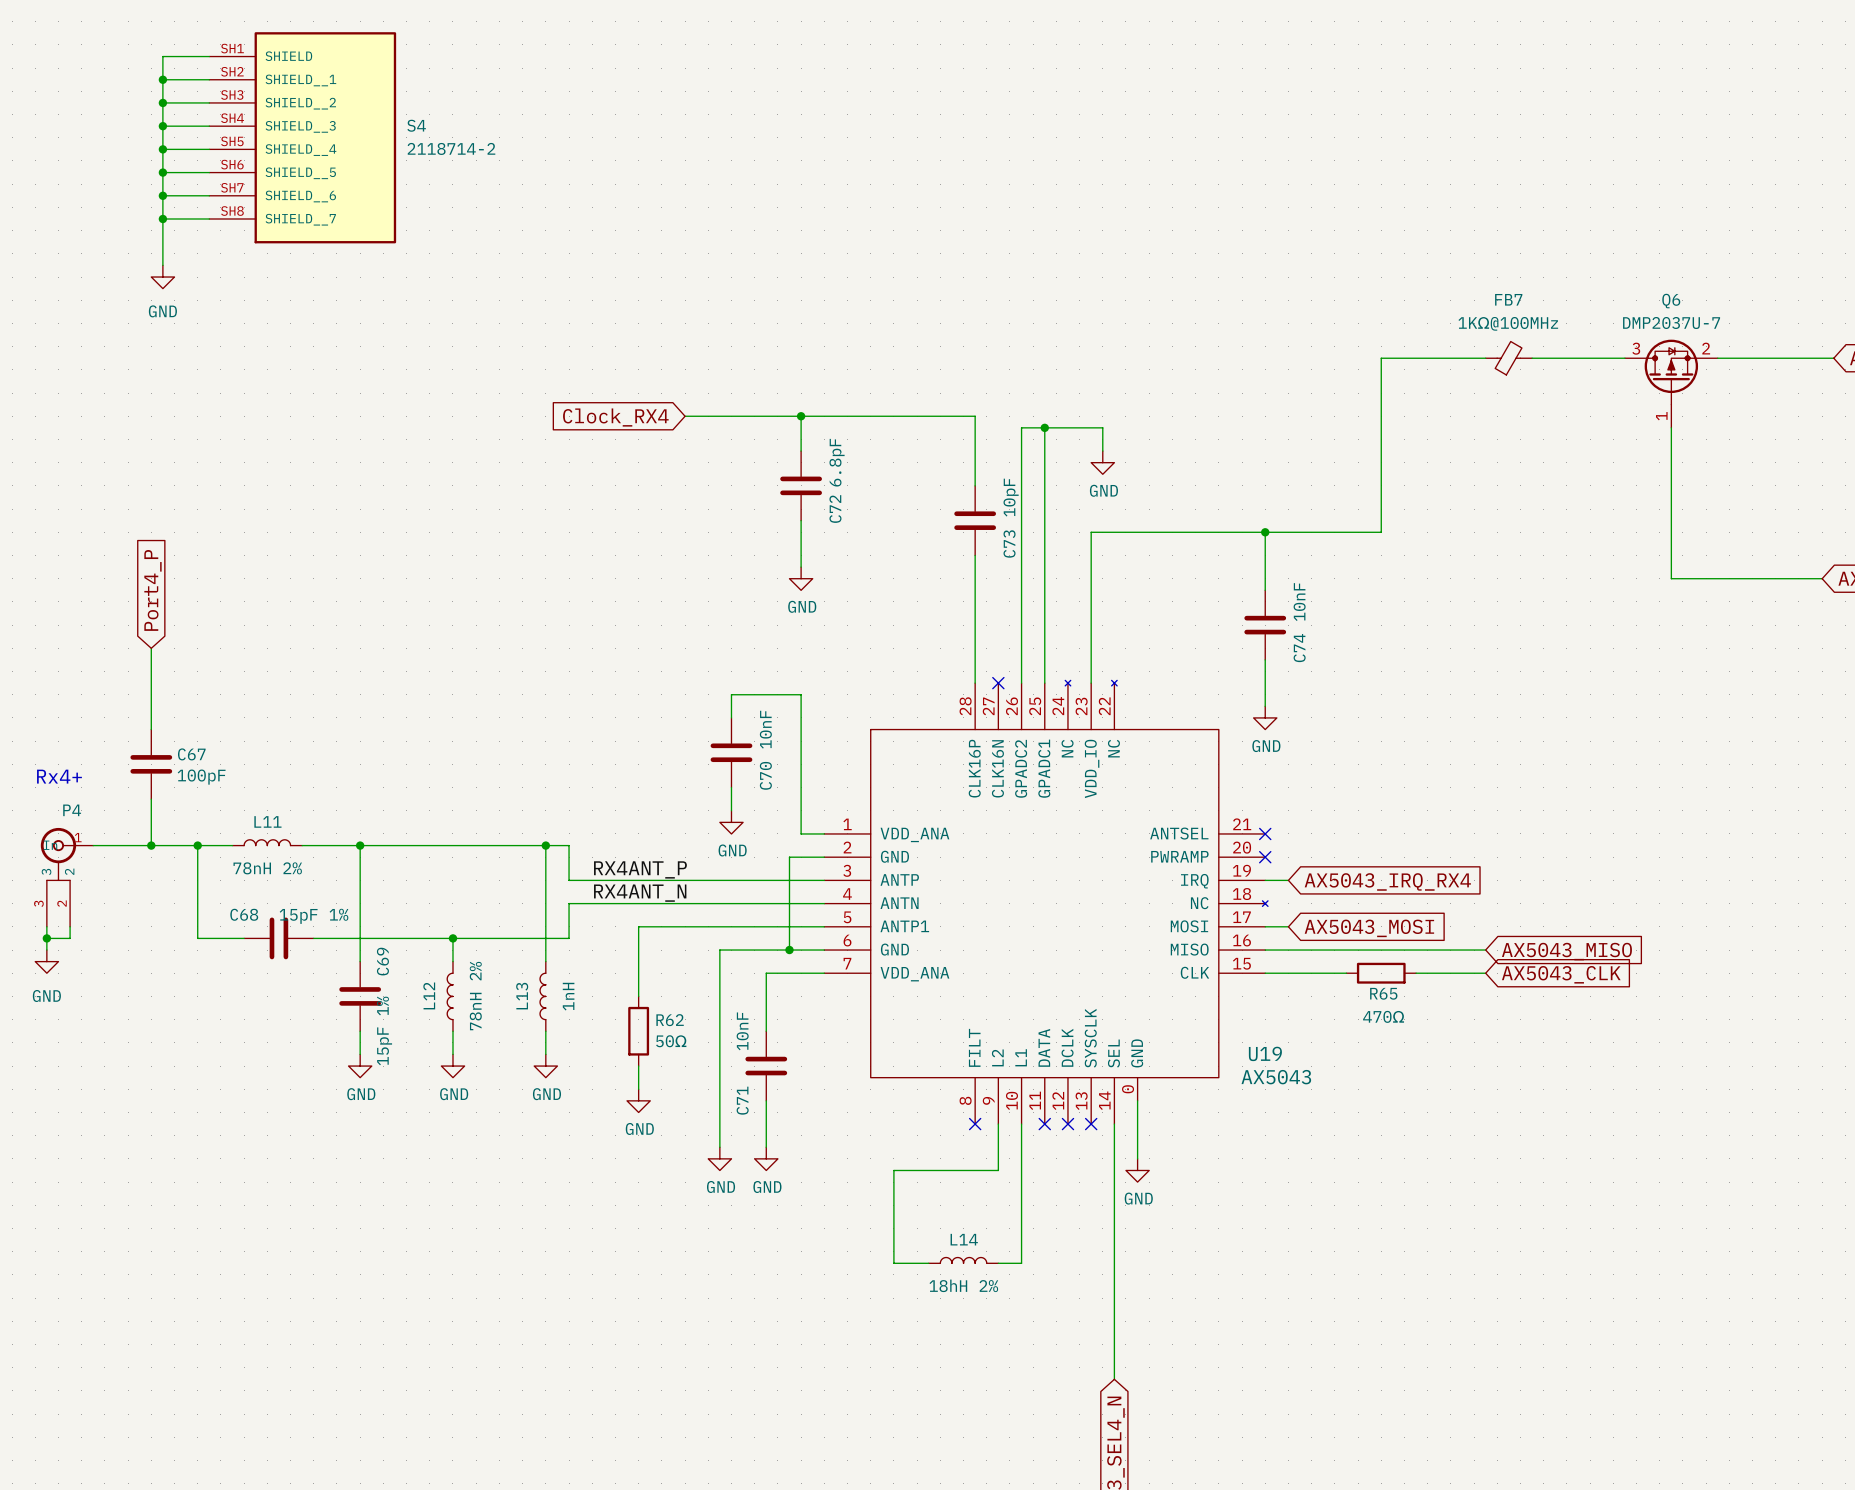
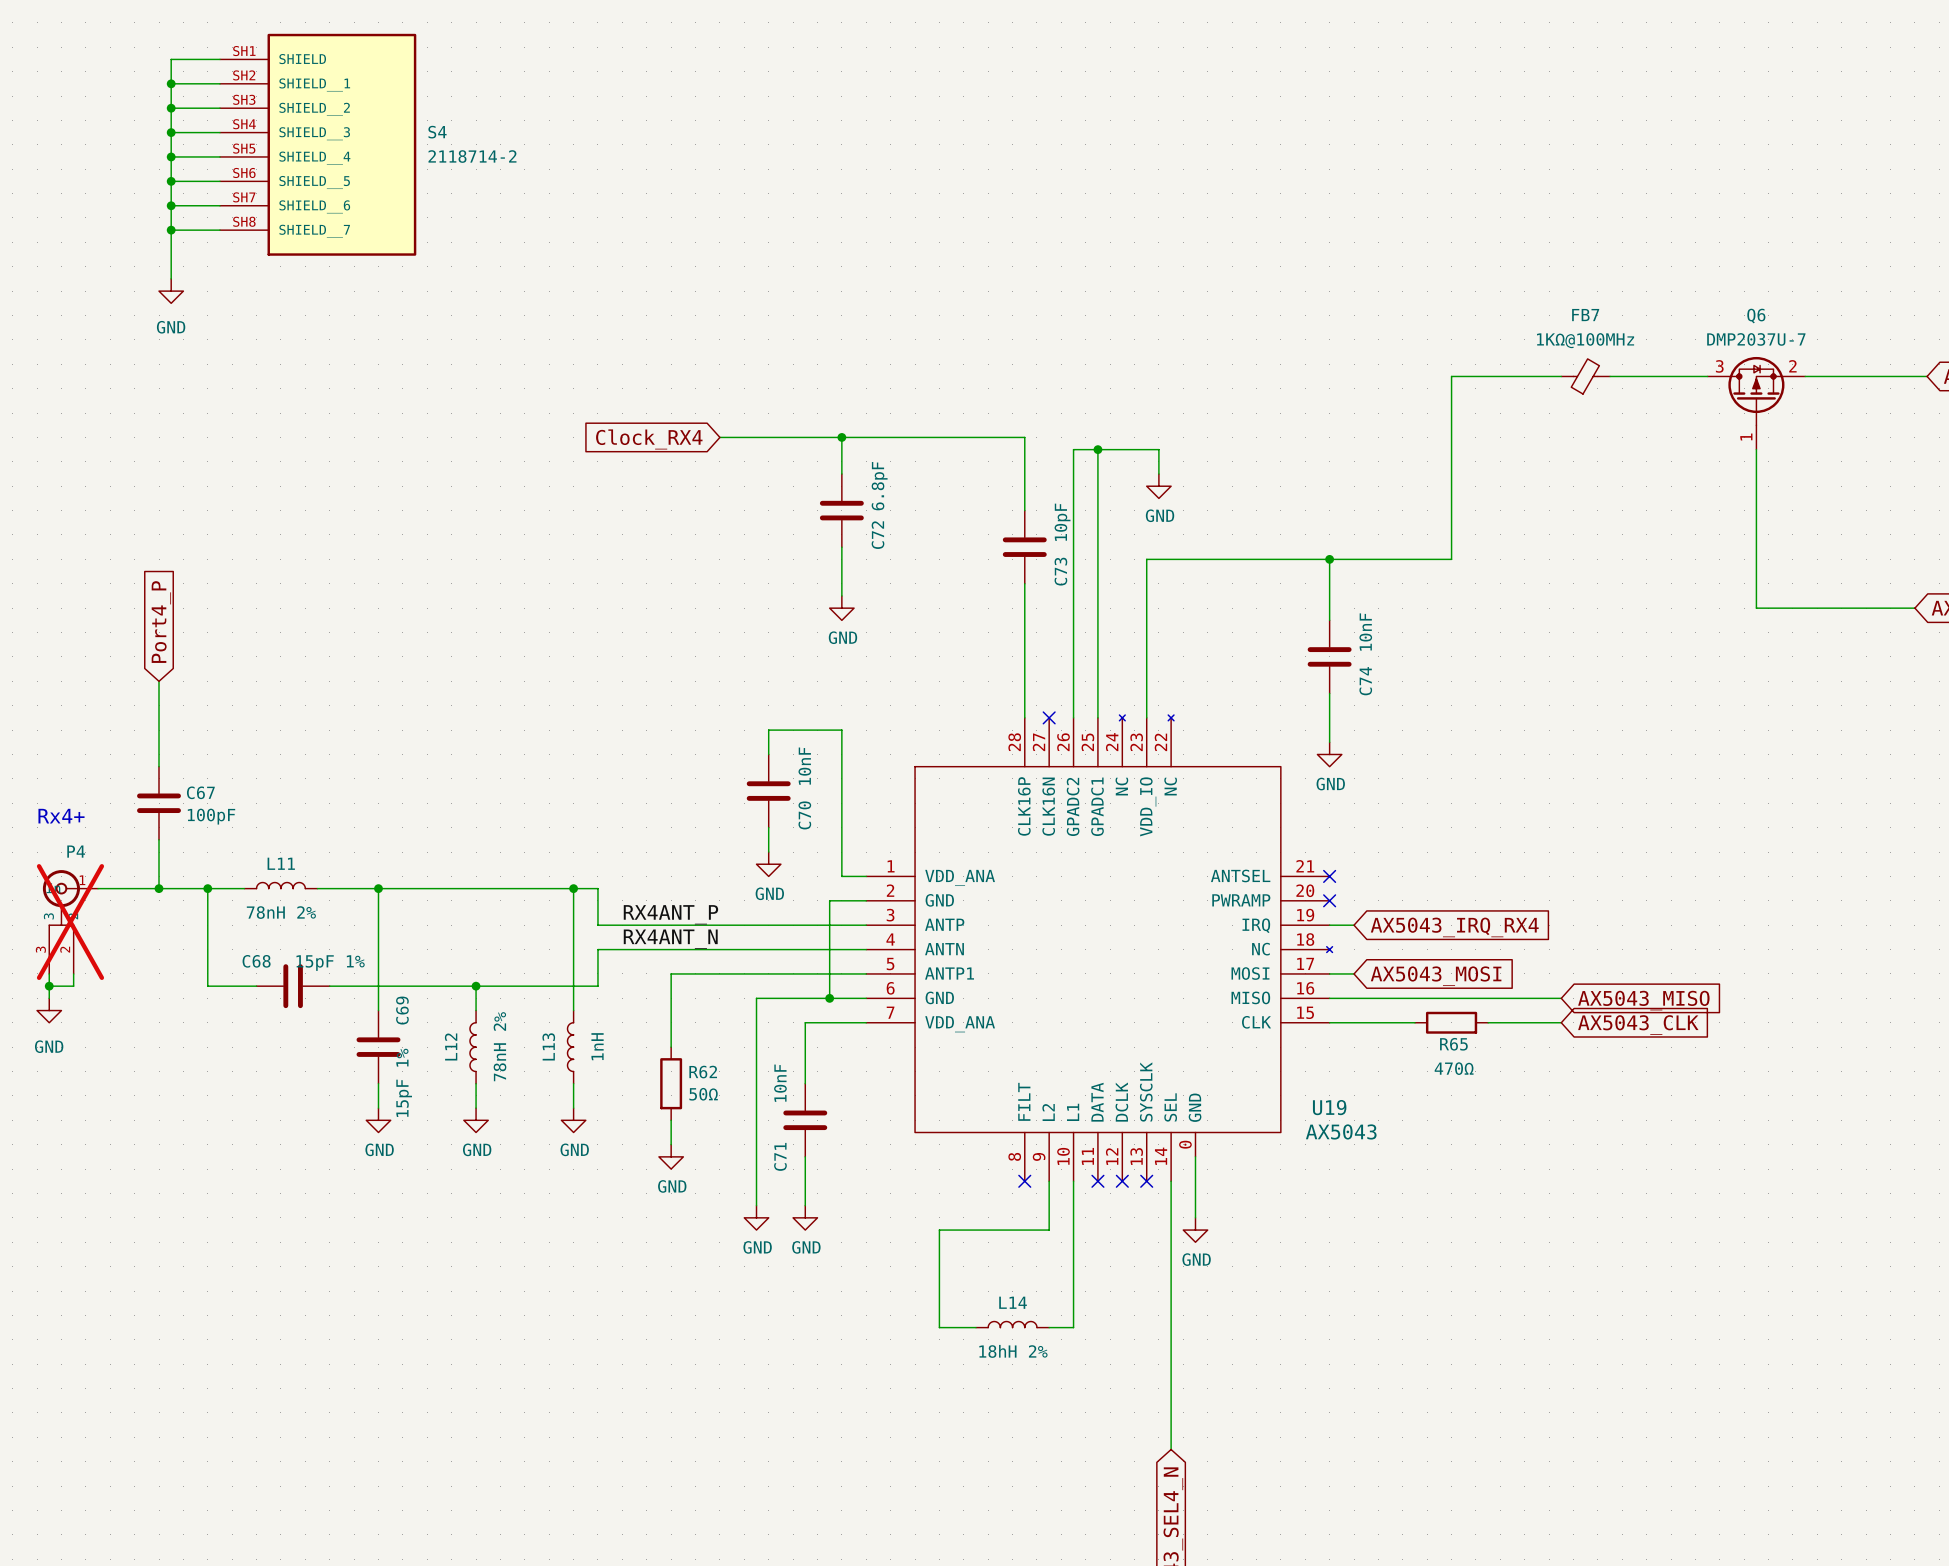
P4 do-not-place cross: none -> (70, 922)

